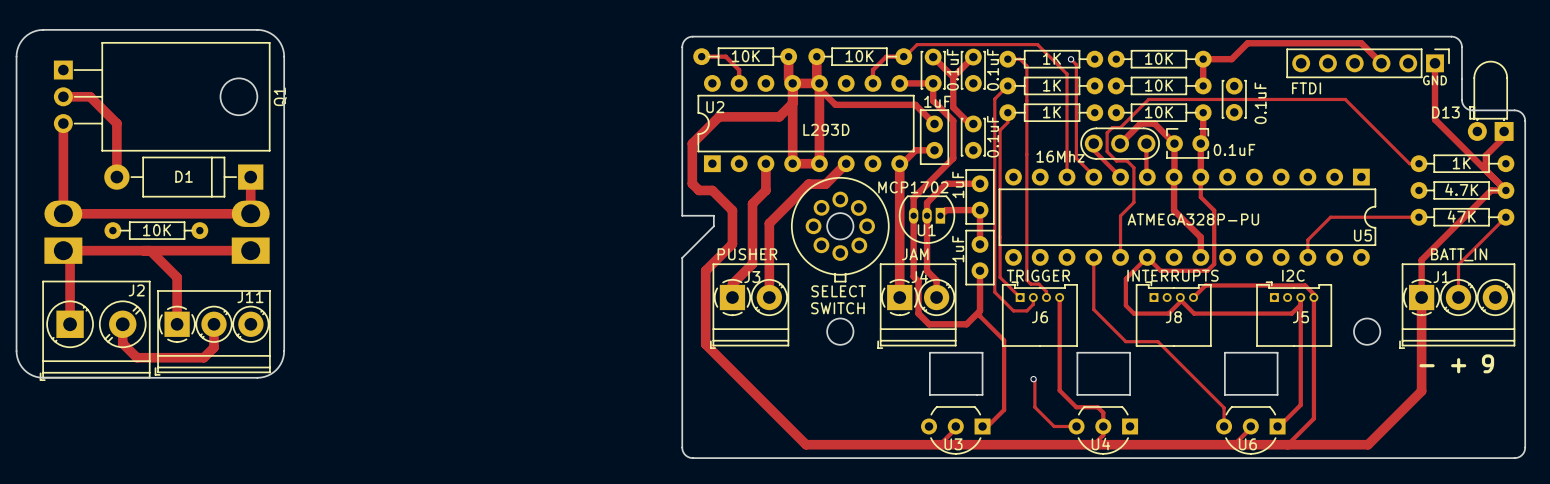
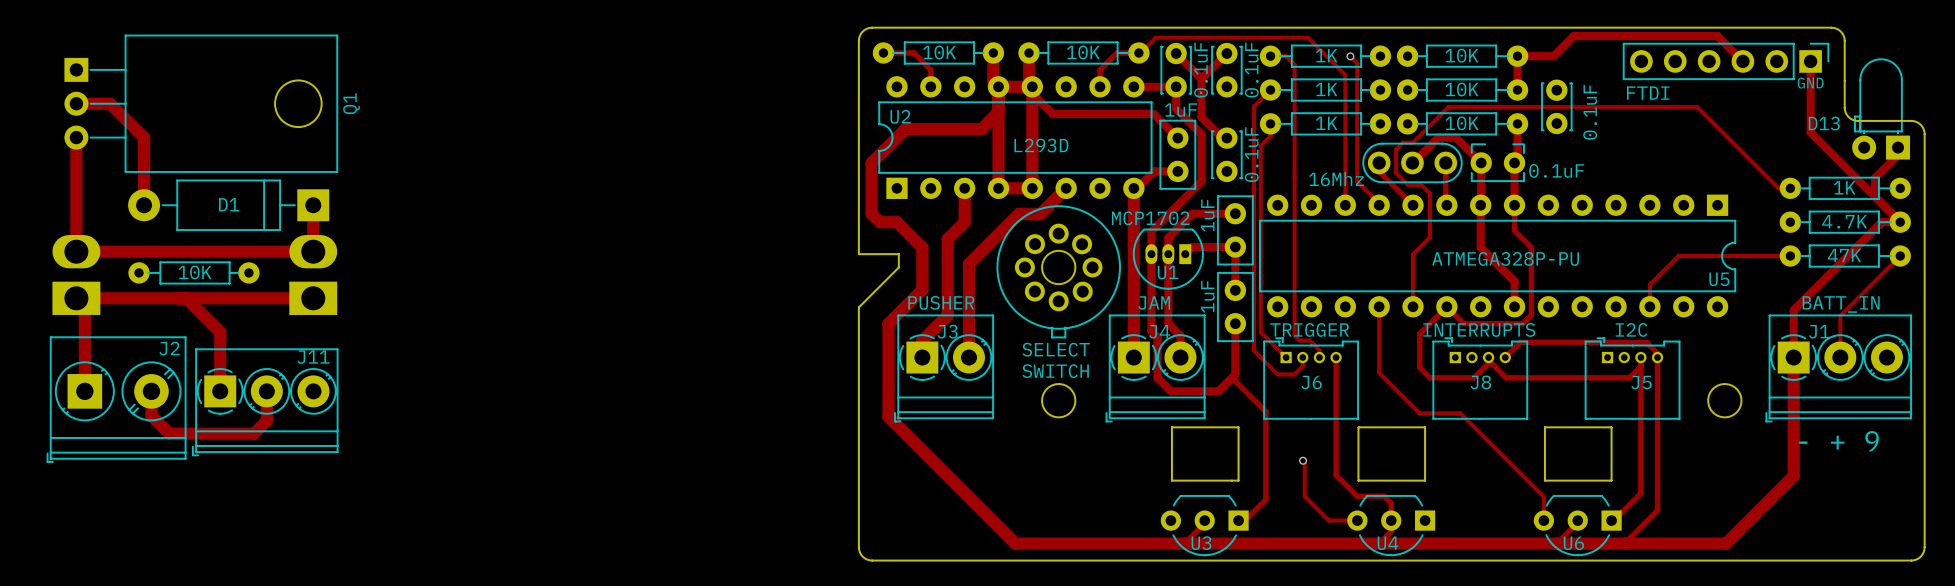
board edge: (43, 29) (257, 29) (270, 33) (280, 43) (284, 56) (284, 351) (280, 364) (270, 374) (257, 377) (43, 377) (29, 374) (20, 364) (16, 351) (16, 53) (24, 37) (33, 31) (43, 29) -> none

